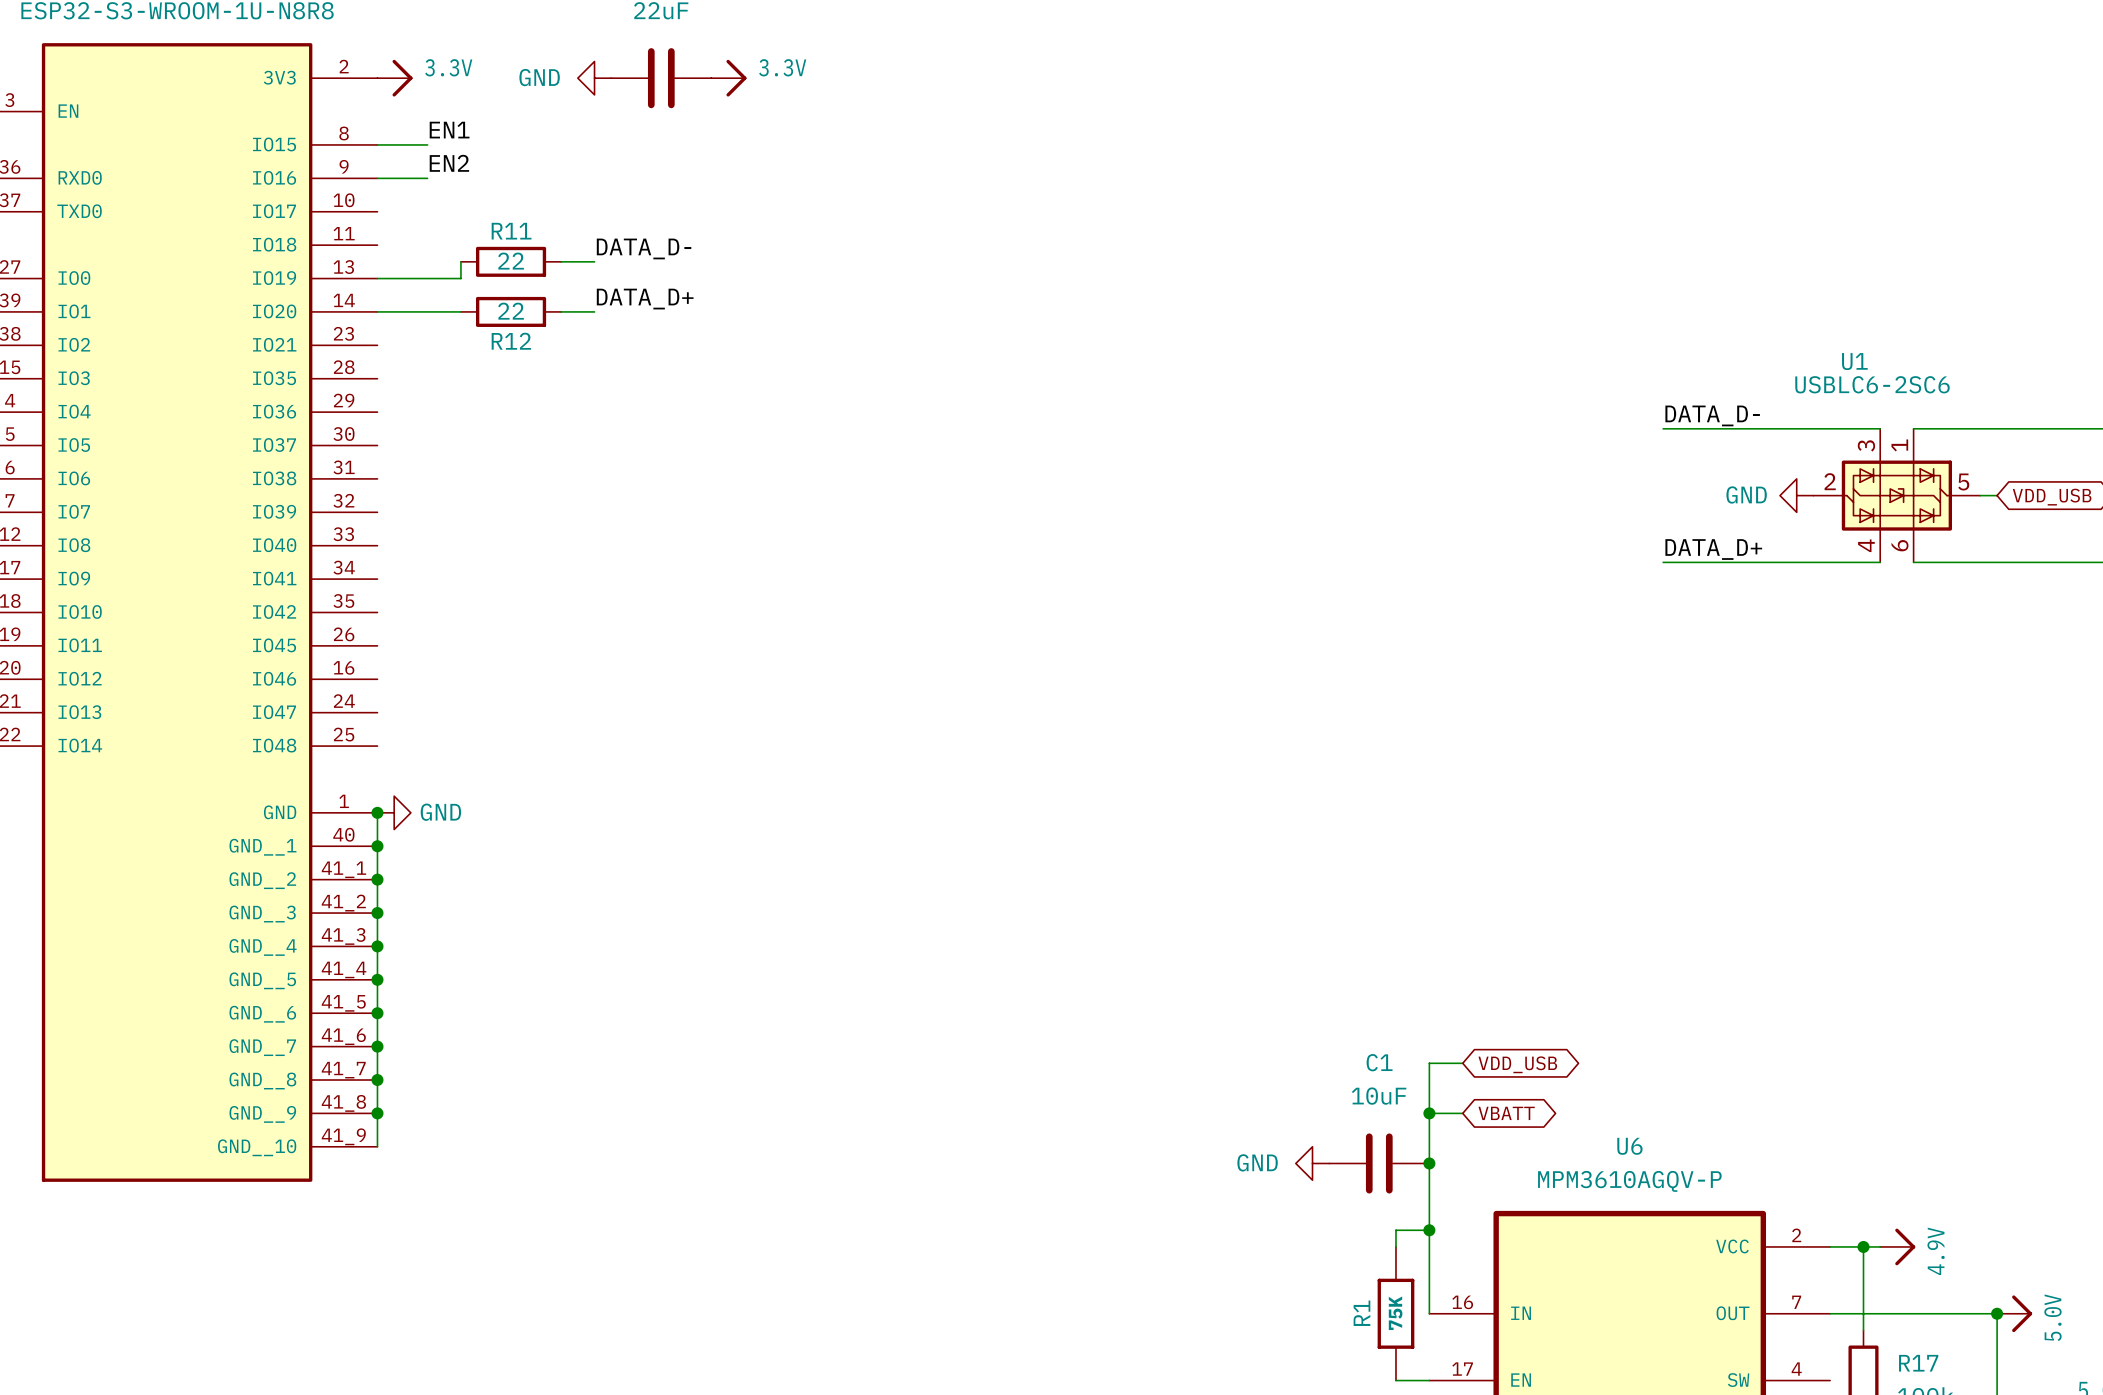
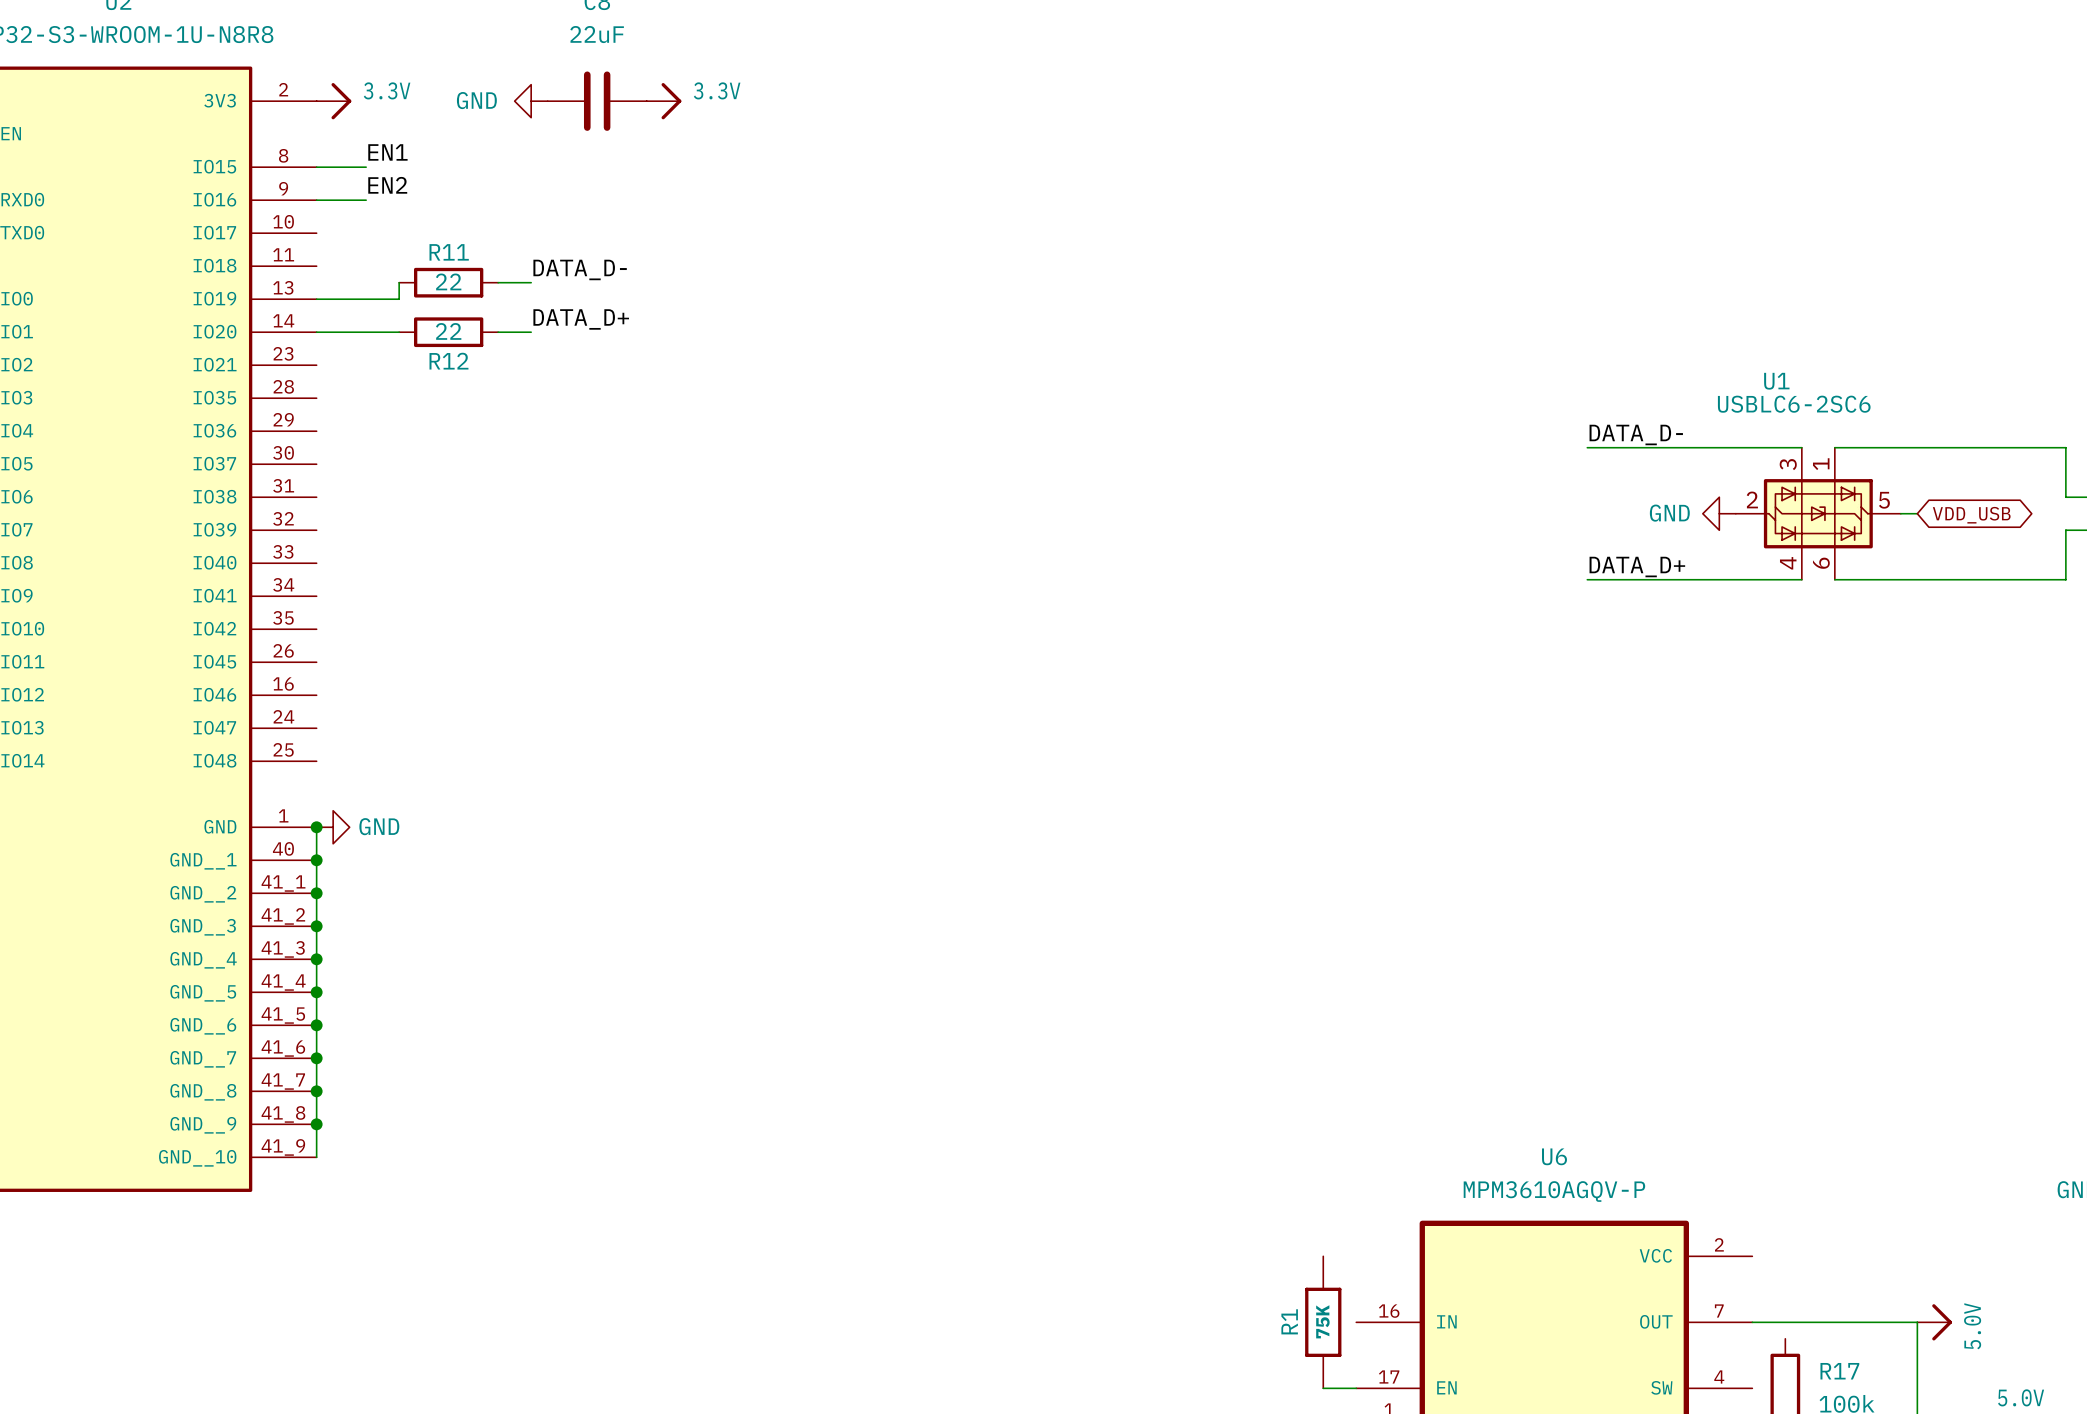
wire: (1462, 1063) (1429, 1063) (1429, 1313) -> none
global label: VDD_USB (1517, 1064) -> none
wire: (1429, 1113) (1462, 1113) -> none
junction: (1429, 1113) -> none
global label: VBATT (1506, 1113) -> none
power symbol: GND (1312, 1163) -> none
C1: 10uF (1379, 1163) -> none
junction: (1429, 1163) -> none
wire: (1429, 1230) (1395, 1230) (1395, 1246) -> none
junction: (1429, 1230) -> none
wire: (1830, 1246) (1880, 1246) -> none
wire: (1863, 1246) (1863, 1330) -> none
junction: (1863, 1246) -> none
power symbol: 4.9V (1897, 1246) -> none
junction: (1997, 1313) -> none

